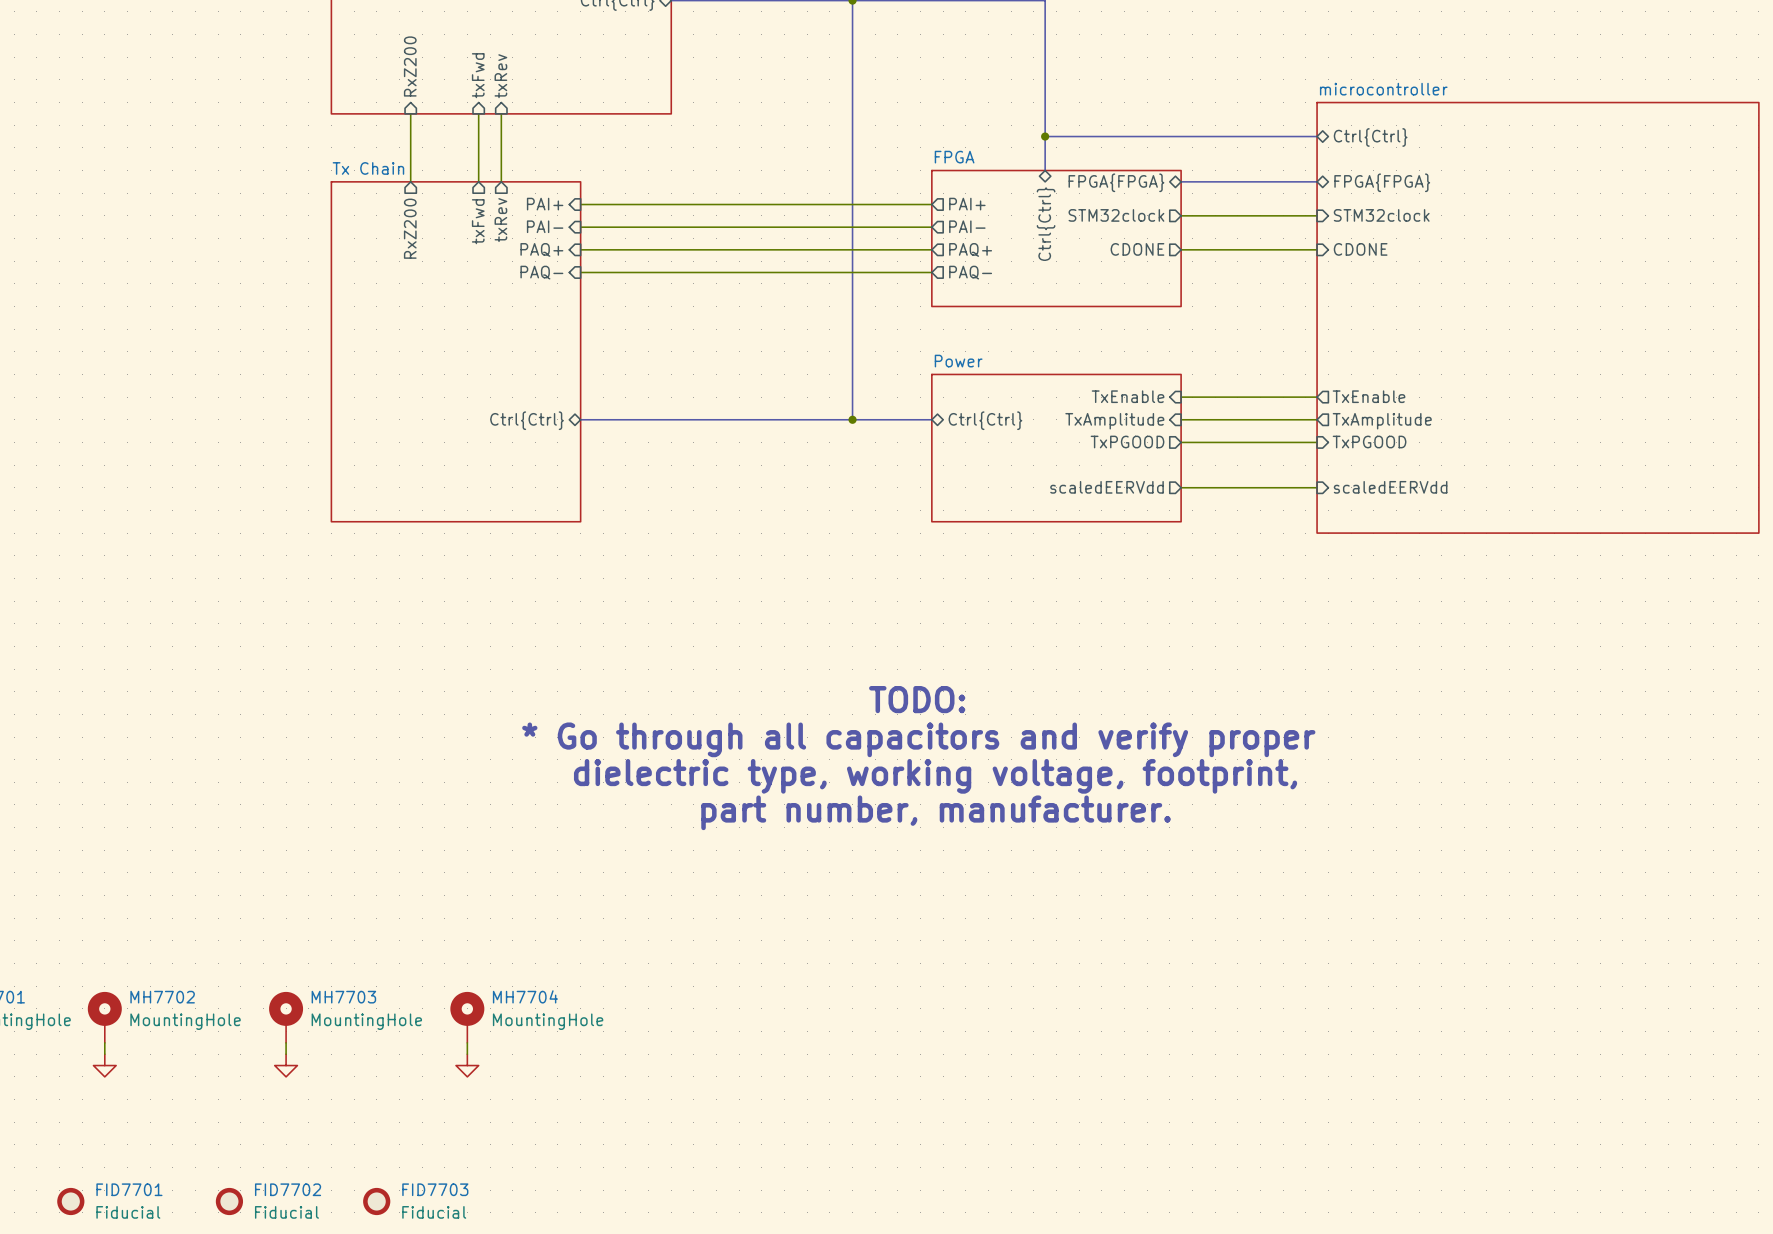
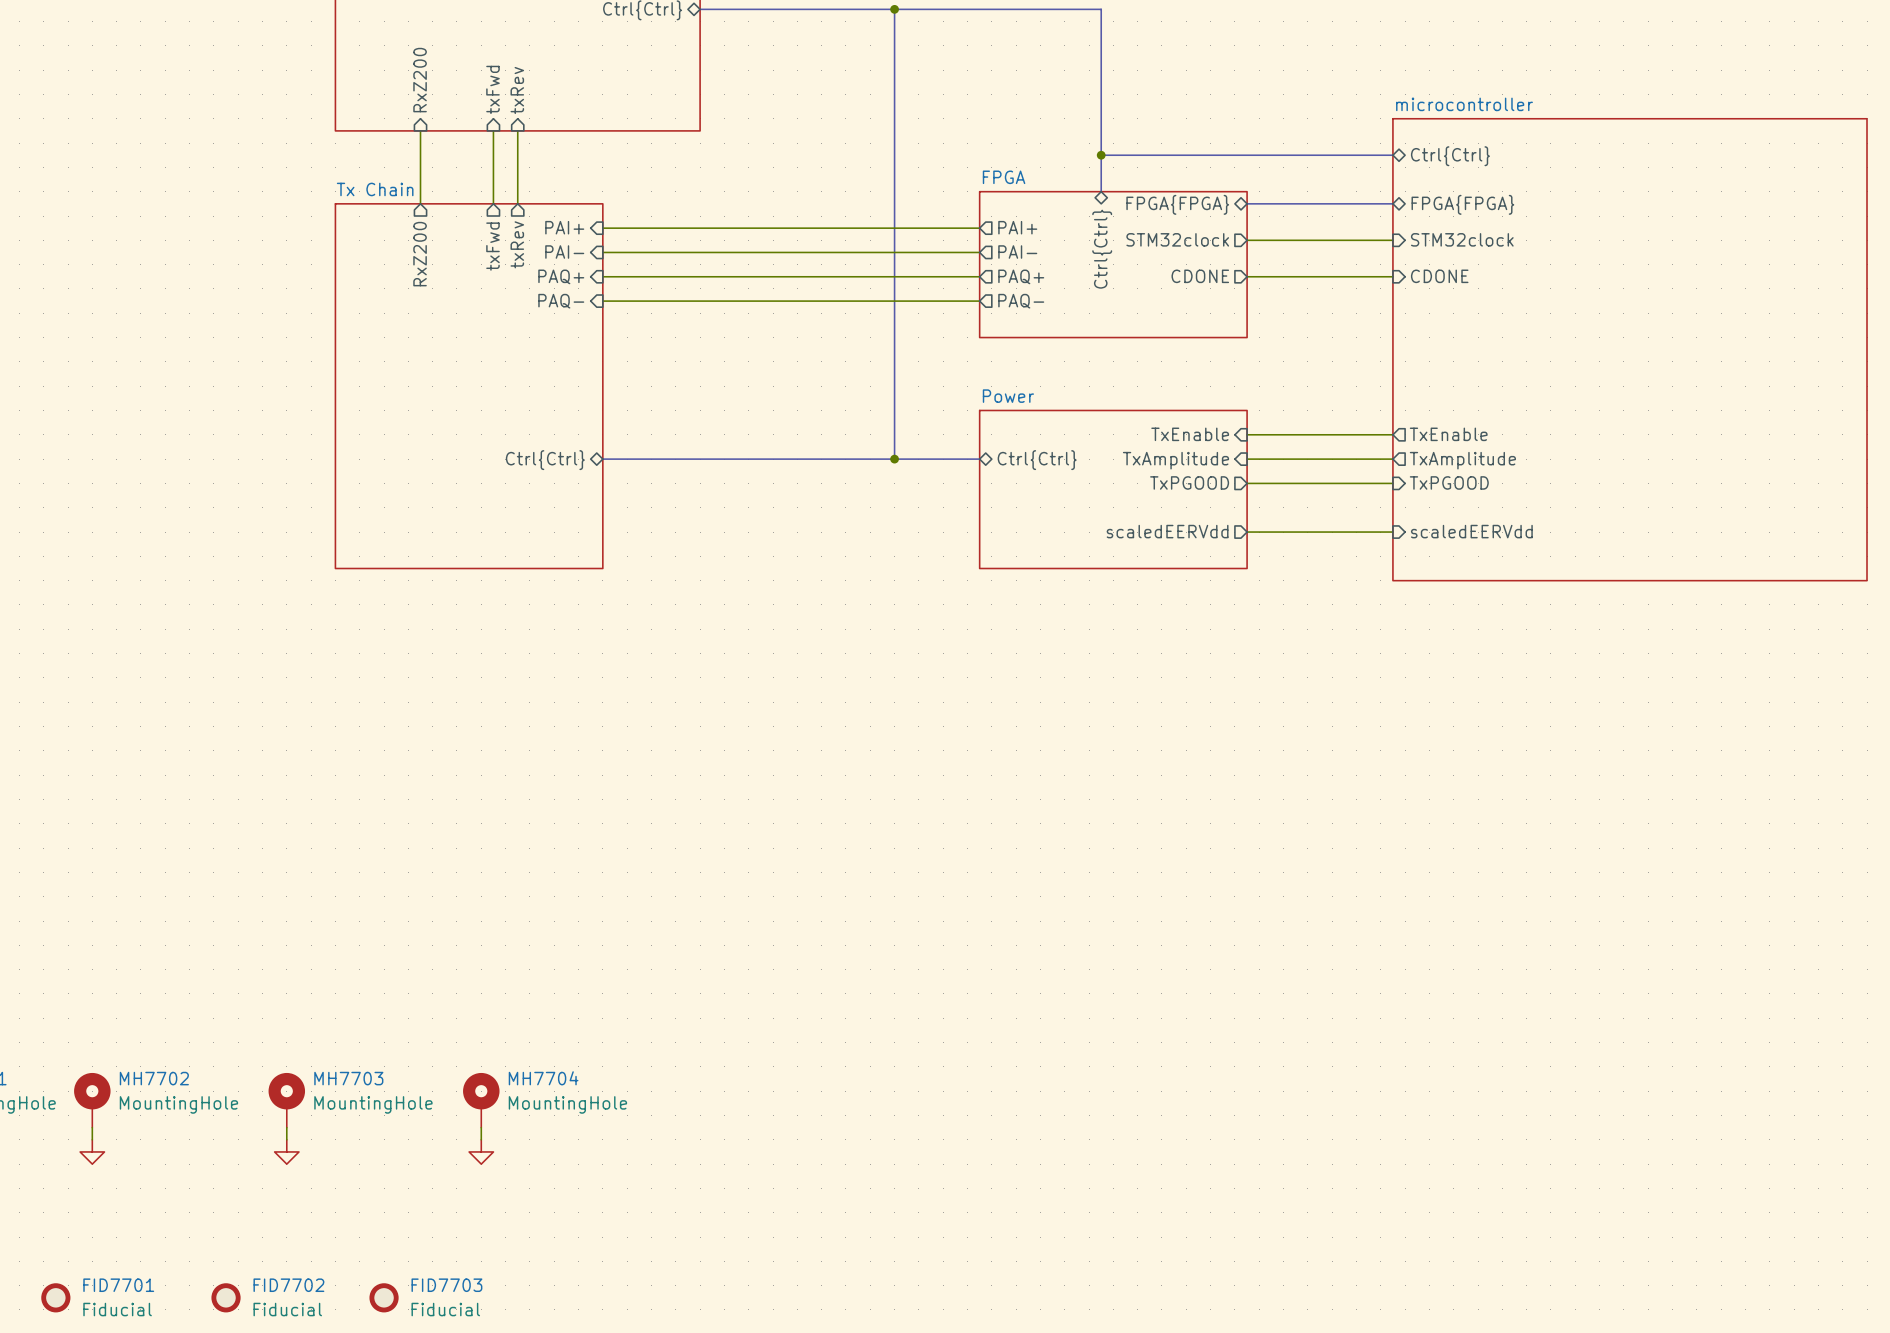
text: TODO: (917, 699) -> none
text: * Go through all capacitors and verify proper (918, 739) -> none
text: dielectric type, working voltage, footprint, (935, 776) -> none
text: part number, manufacturer. (936, 812) -> none

